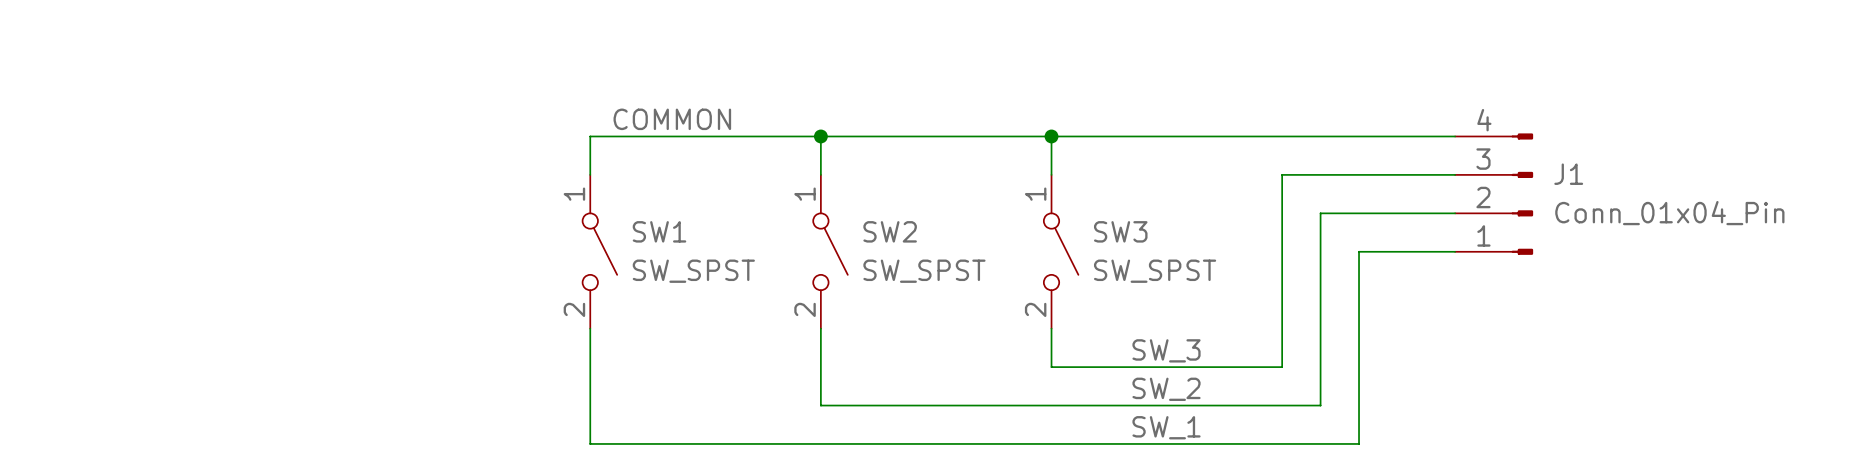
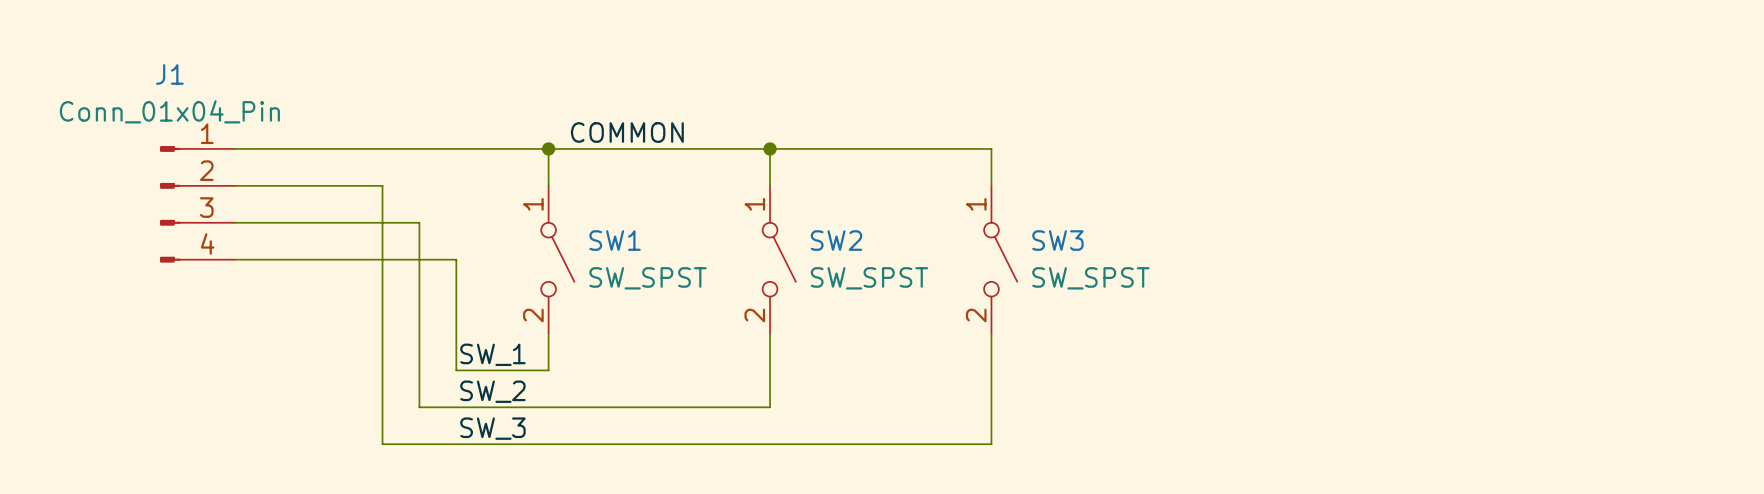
wire: none -> (234, 148) (548, 148)
junction: none -> (548, 148)
wire: (1051, 136) (1455, 136) -> none
junction: (1051, 136) -> none
wire: (1455, 174) (1282, 174) (1282, 367) (1051, 367) -> none
J1 name position: J1 (1568, 174) -> J1 (169, 74)
J1 position: (1494, 194) -> (197, 204)
J1 rotation: 0° (1522, 194) -> 180° (170, 204)
wire: (1455, 213) (1320, 213) (1320, 405) (820, 405) -> (234, 222) (419, 222) (419, 407) (770, 407)
J1 value position: Conn_01x04_Pin (1669, 213) -> Conn_01x04_Pin (169, 111)
wire: none -> (234, 259) (456, 259) (456, 370) (548, 370)
wire: (1455, 251) (1359, 251) (1359, 443) (1051, 443) -> (991, 370) (991, 444)
label: none -> SW_1 (492, 354)
label: SW_3 (1166, 350) -> none
wire: (590, 367) (590, 443) -> (234, 185) (382, 185) (382, 444) (548, 444)
label: none -> SW_2 (492, 391)
label: SW_2 (1166, 389) -> none
label: none -> SW_3 (492, 428)
label: SW_1 (1166, 427) -> none

